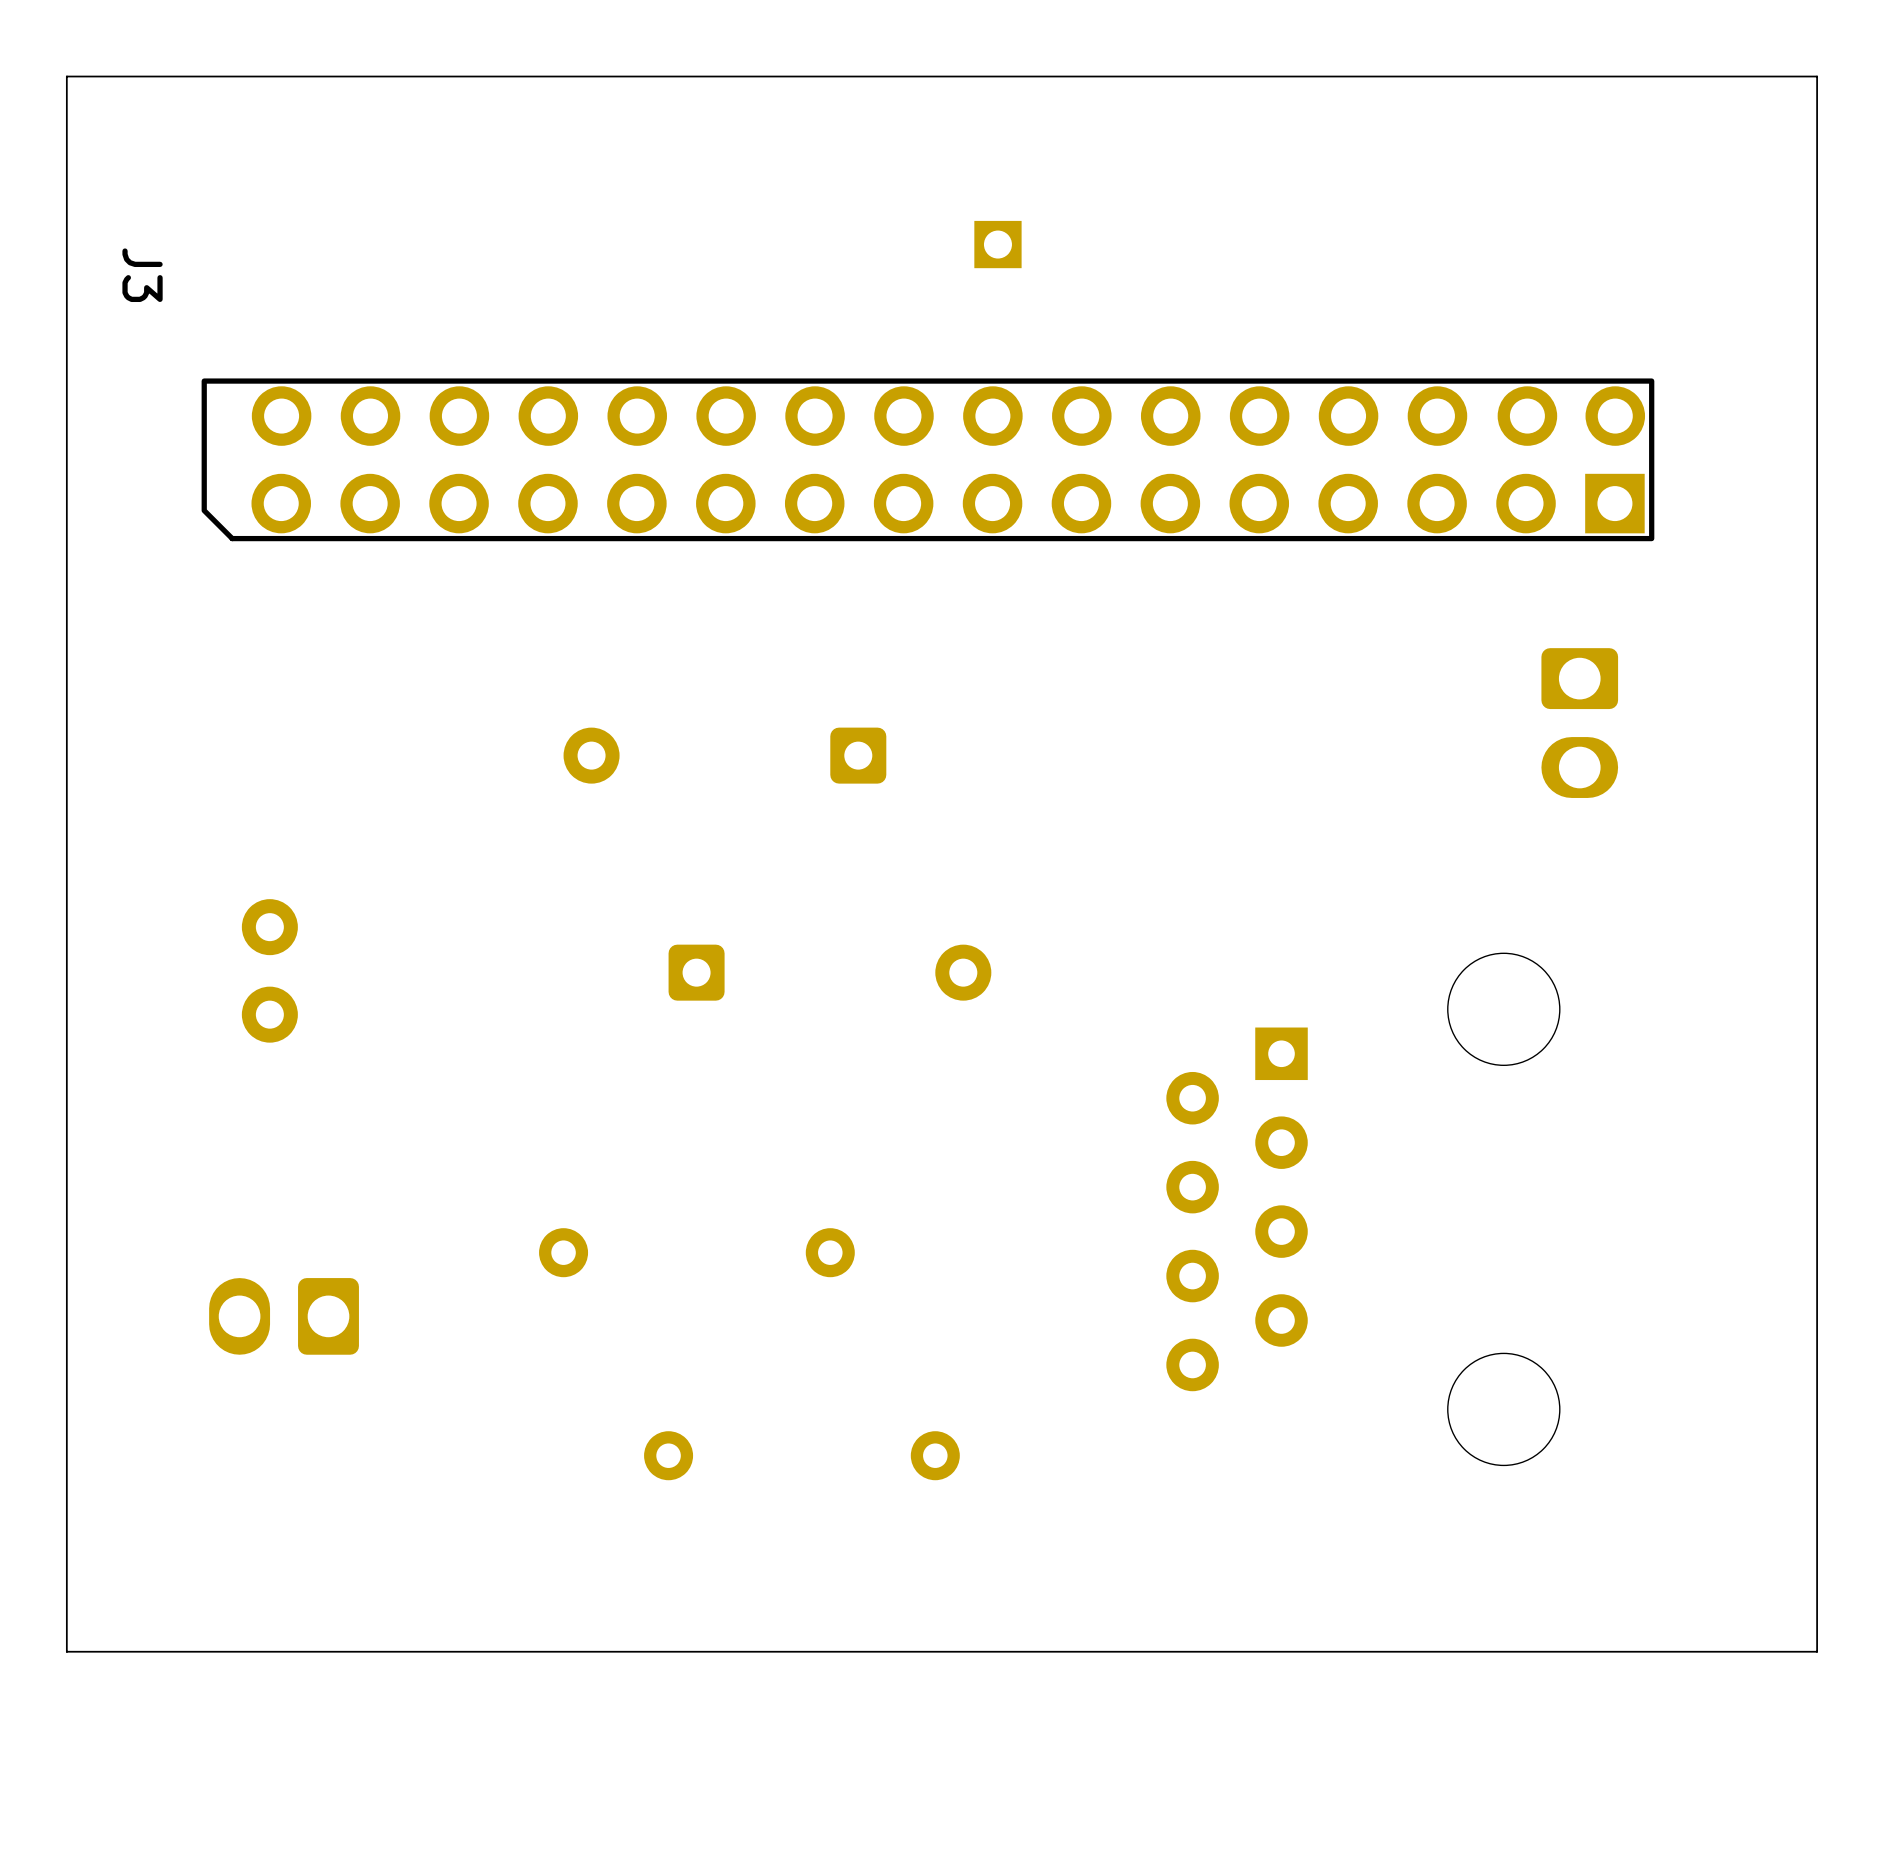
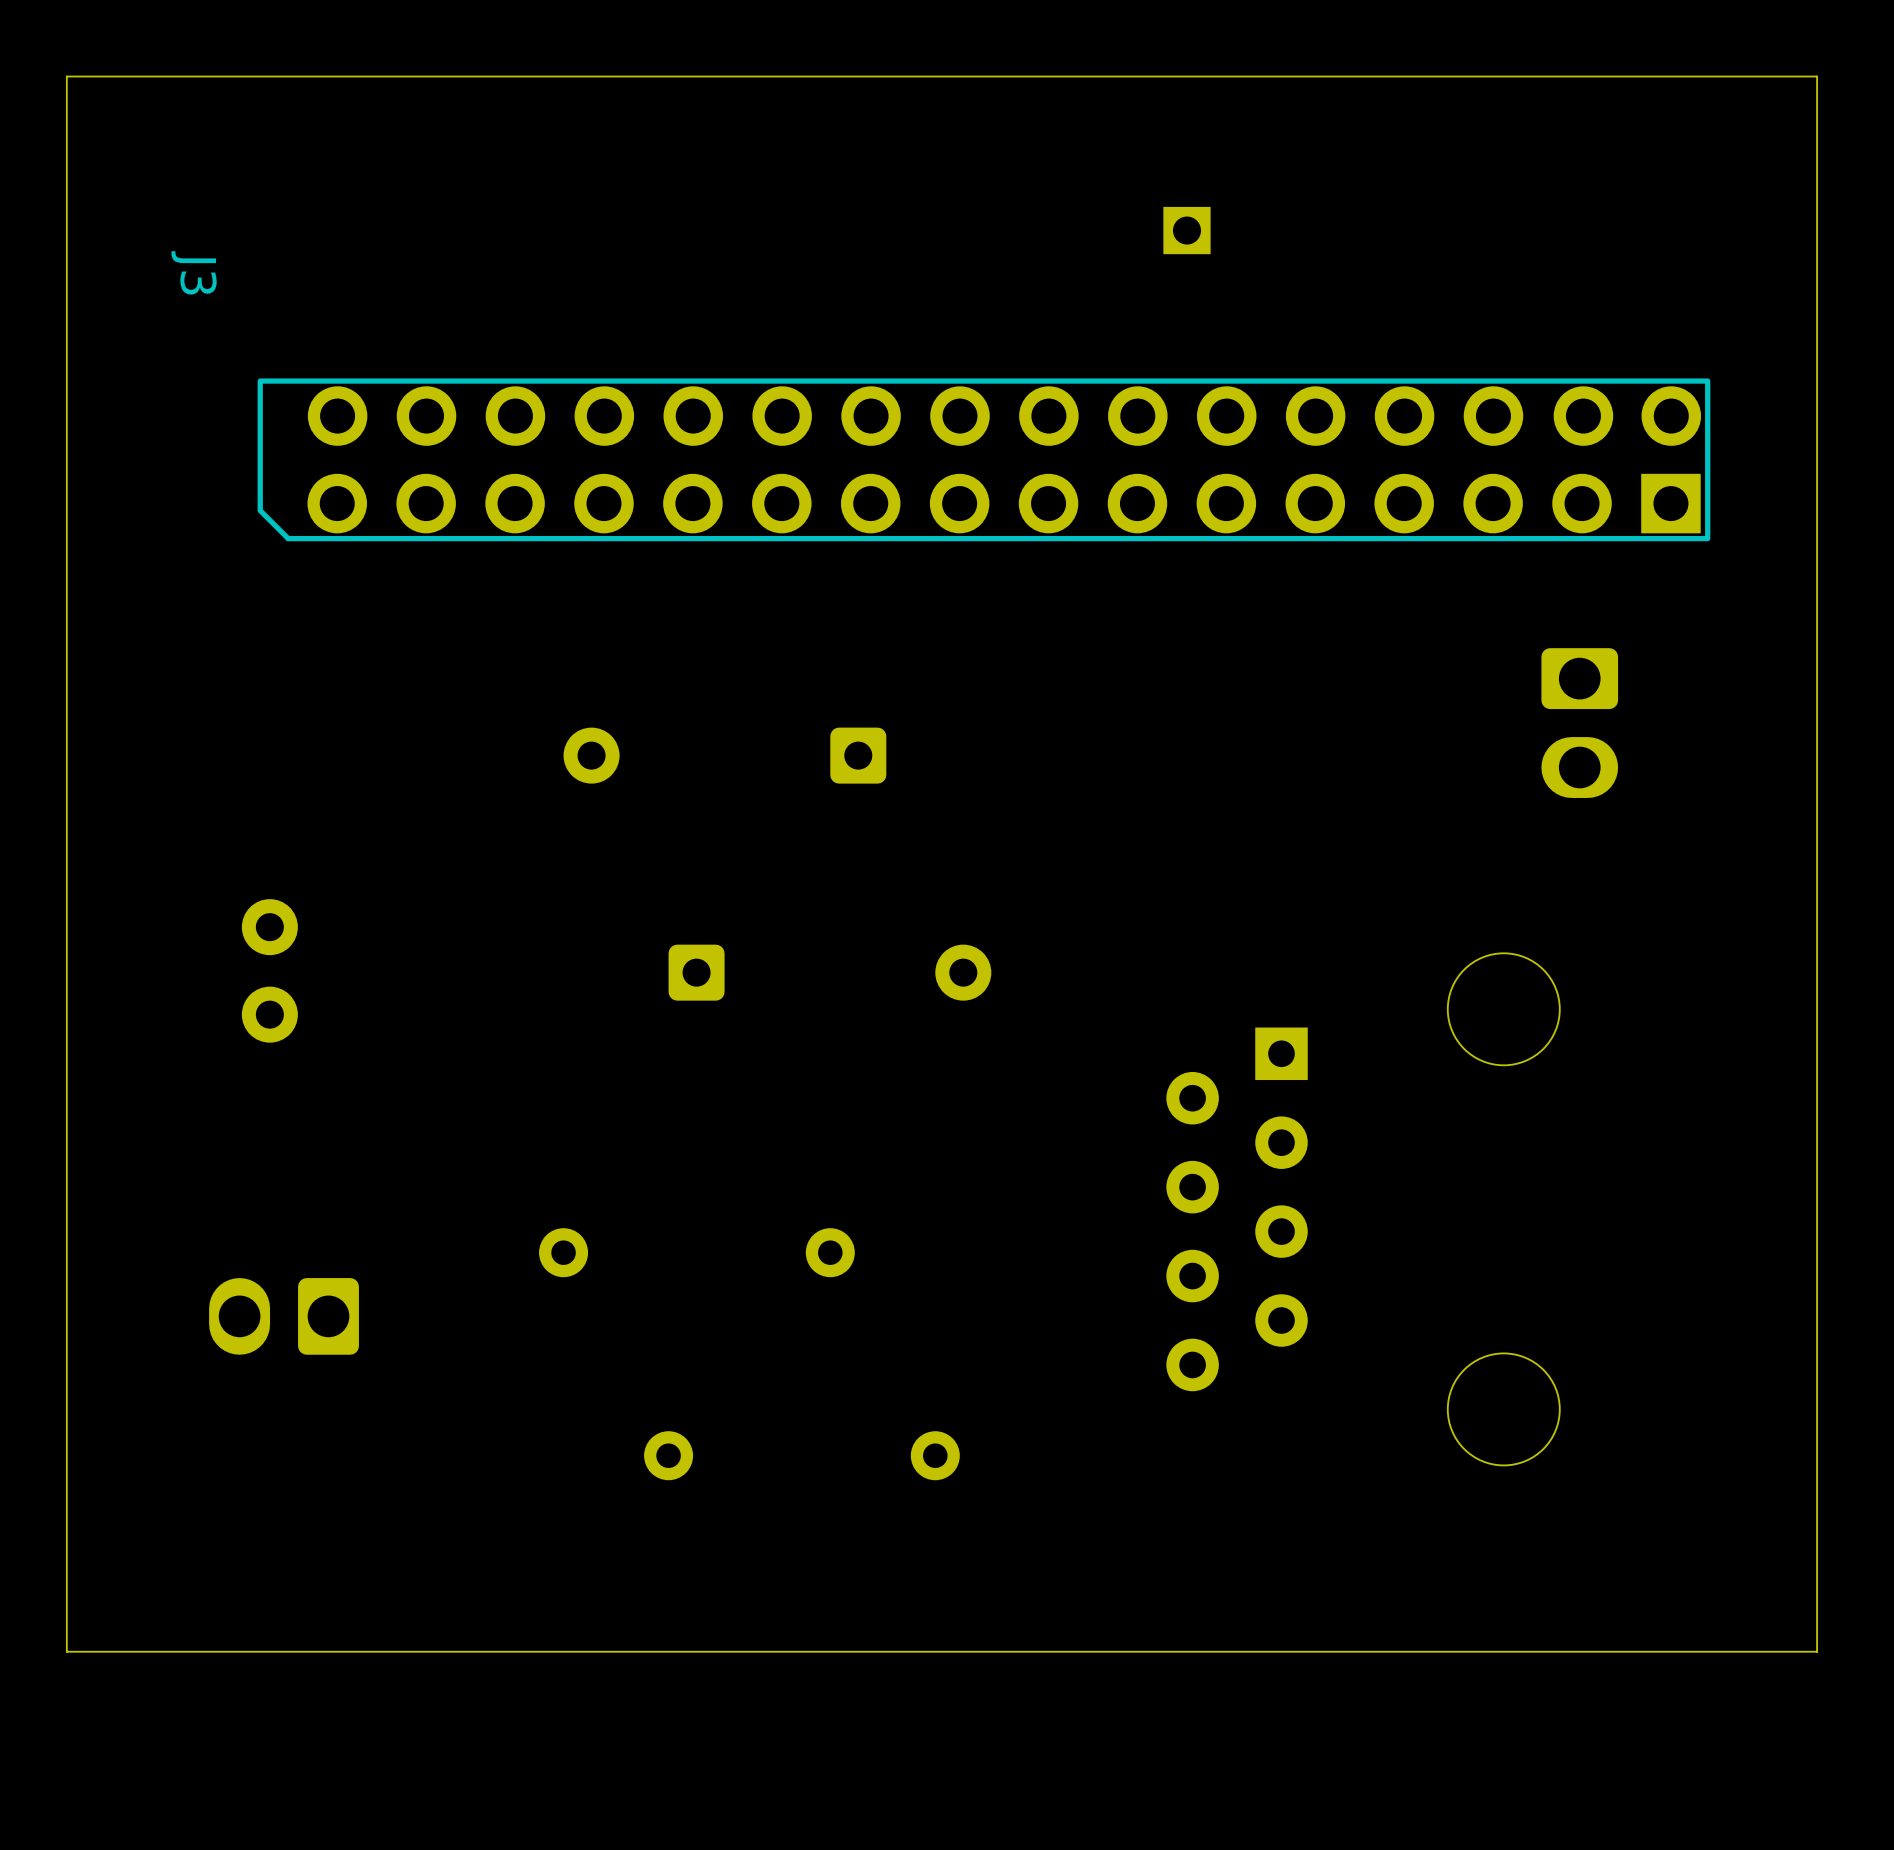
part position: (997, 244) -> (1186, 230)
J3 position: (927, 459) -> (983, 459)

